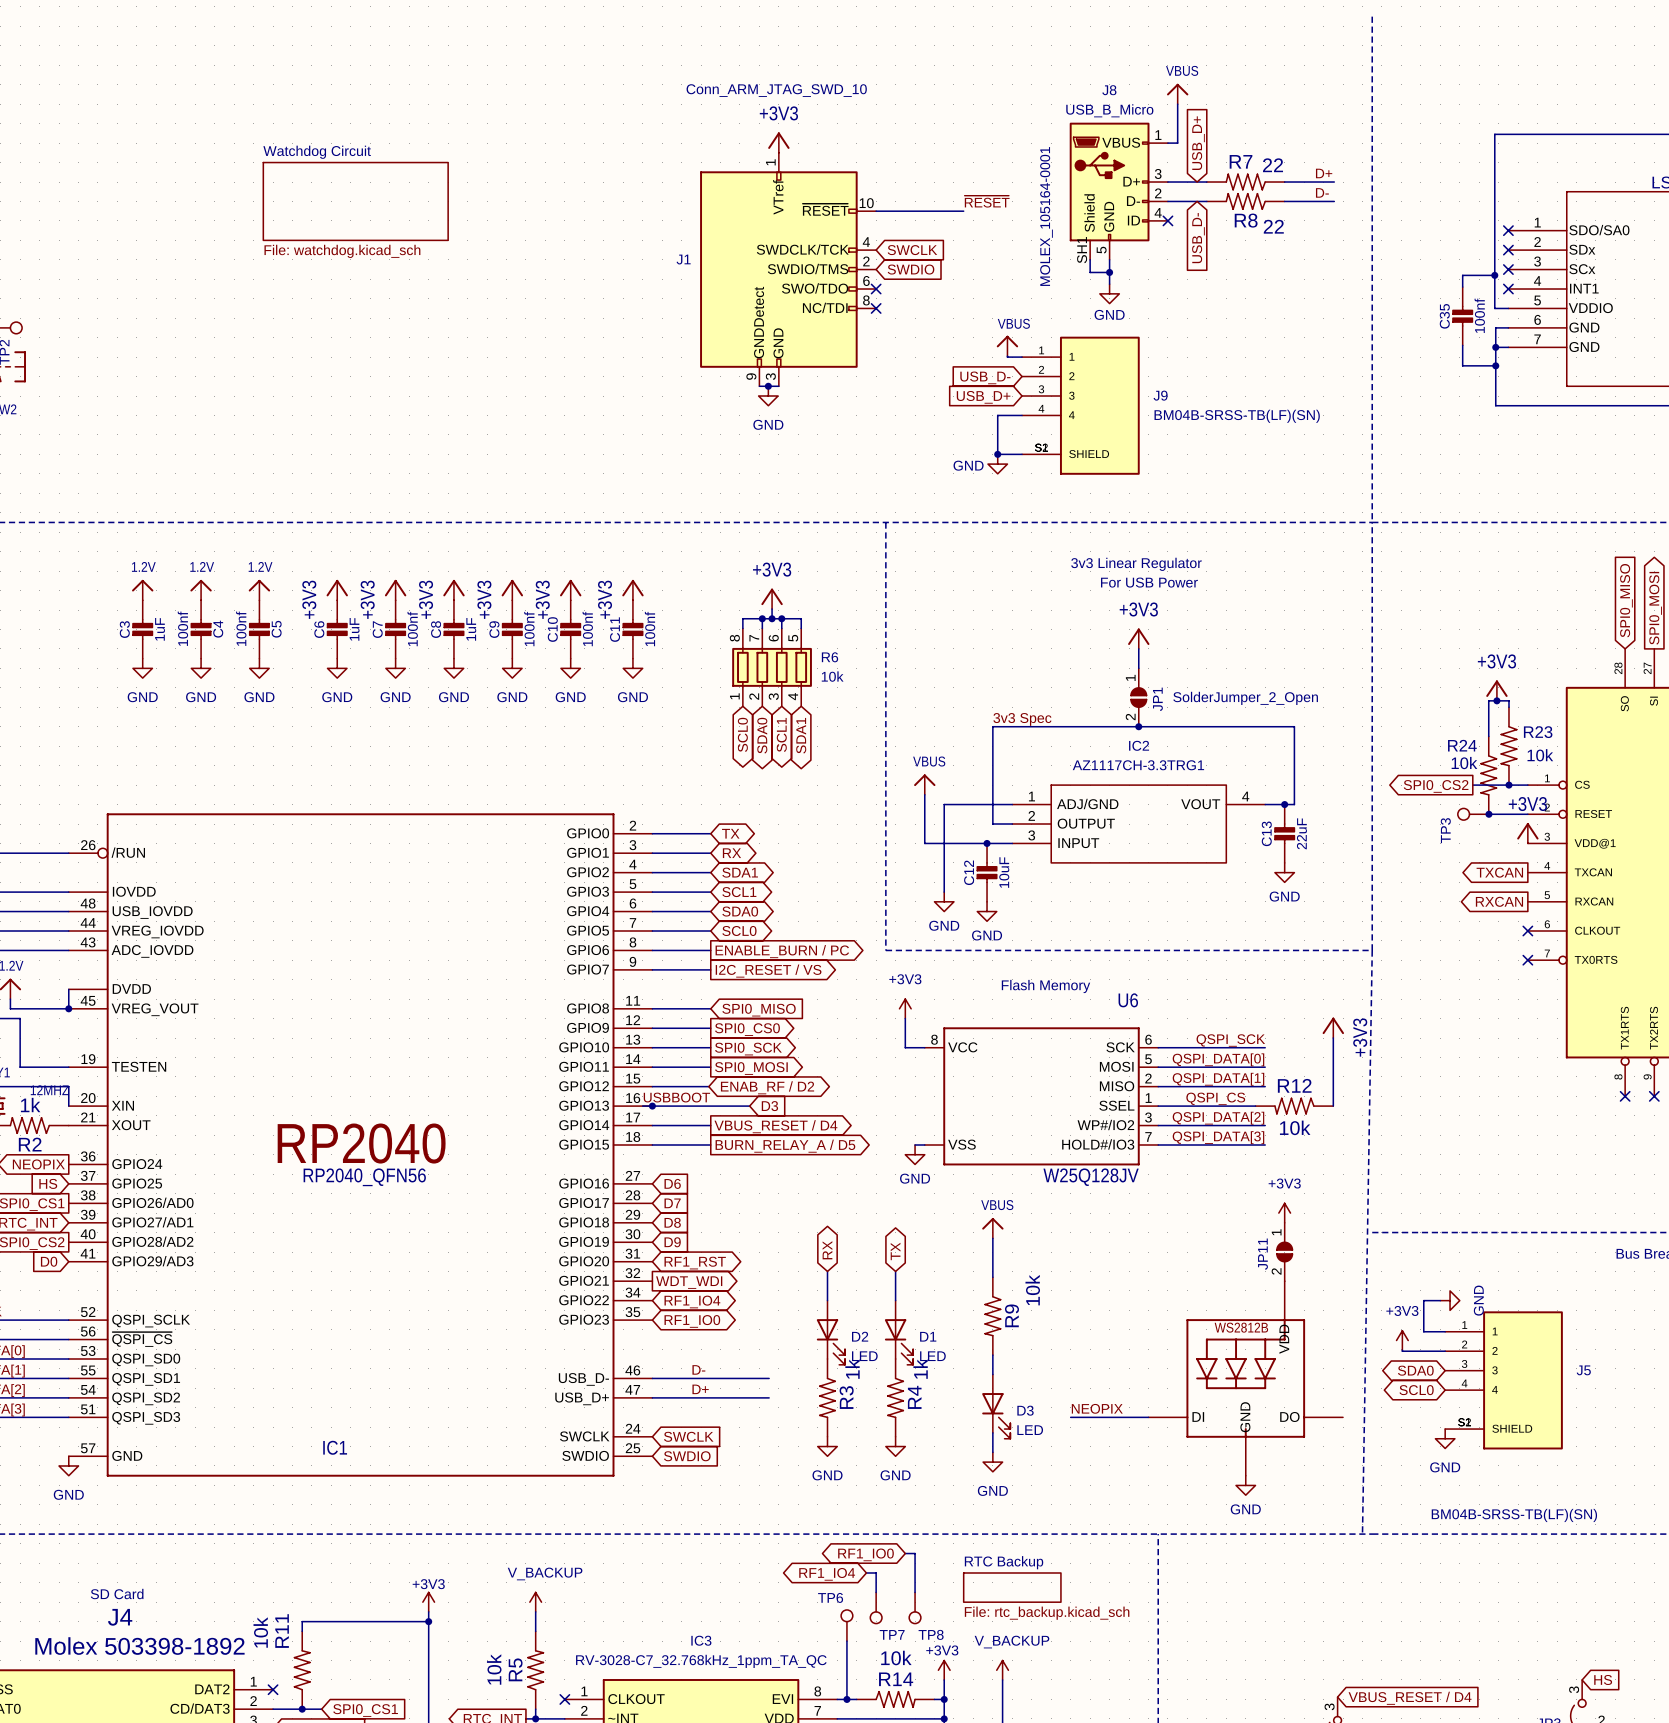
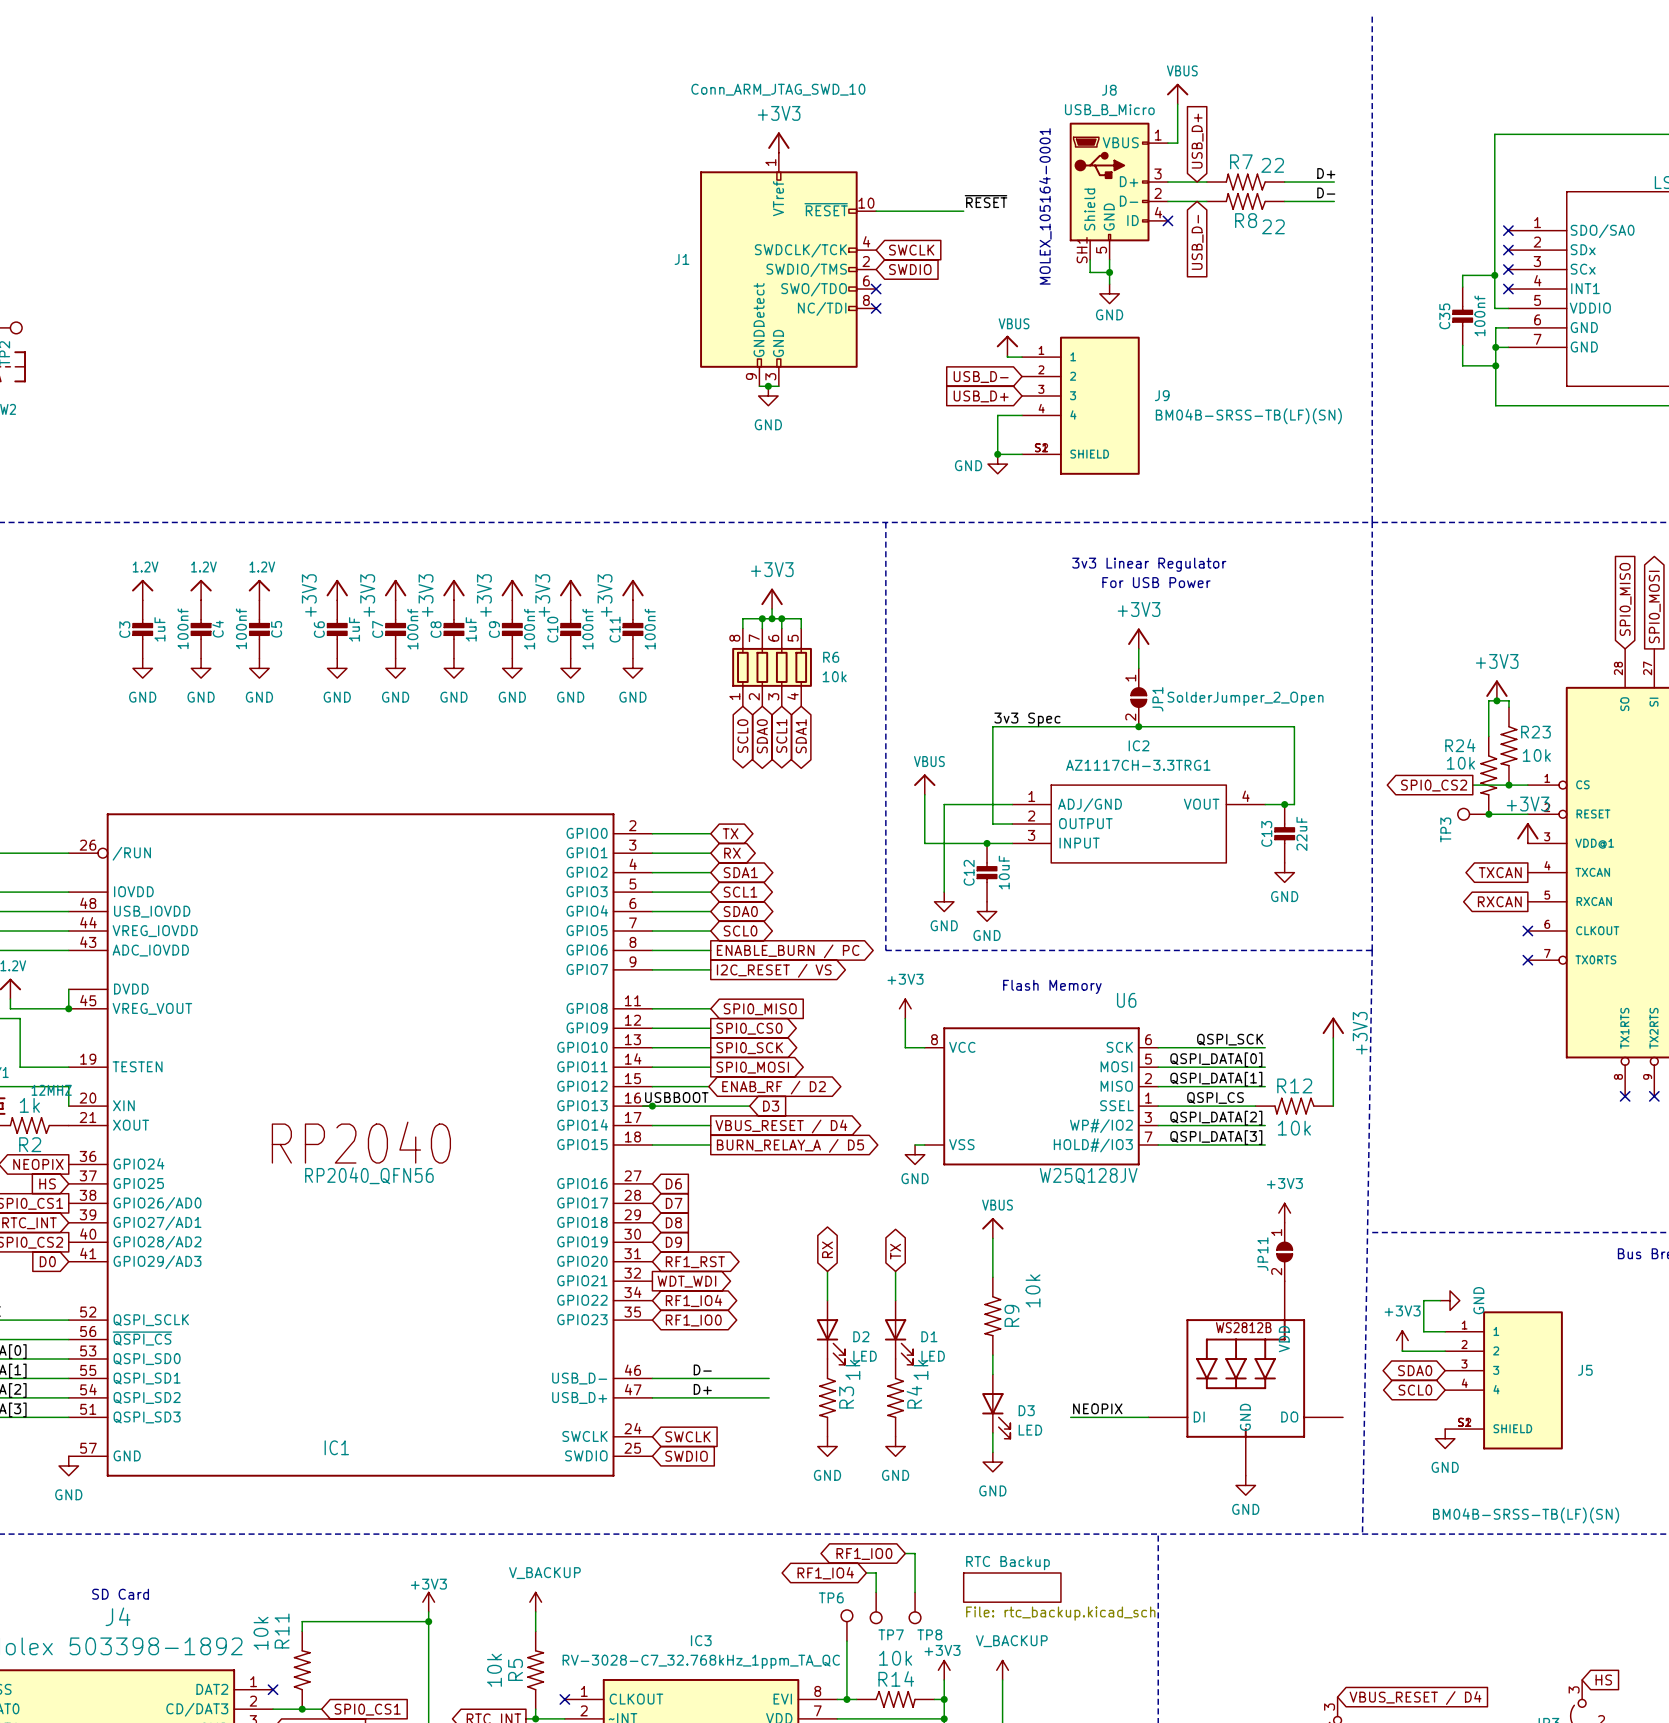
sheet Watchdog Circuit: File: watchdog.kicad_sch (355, 201) -> none

